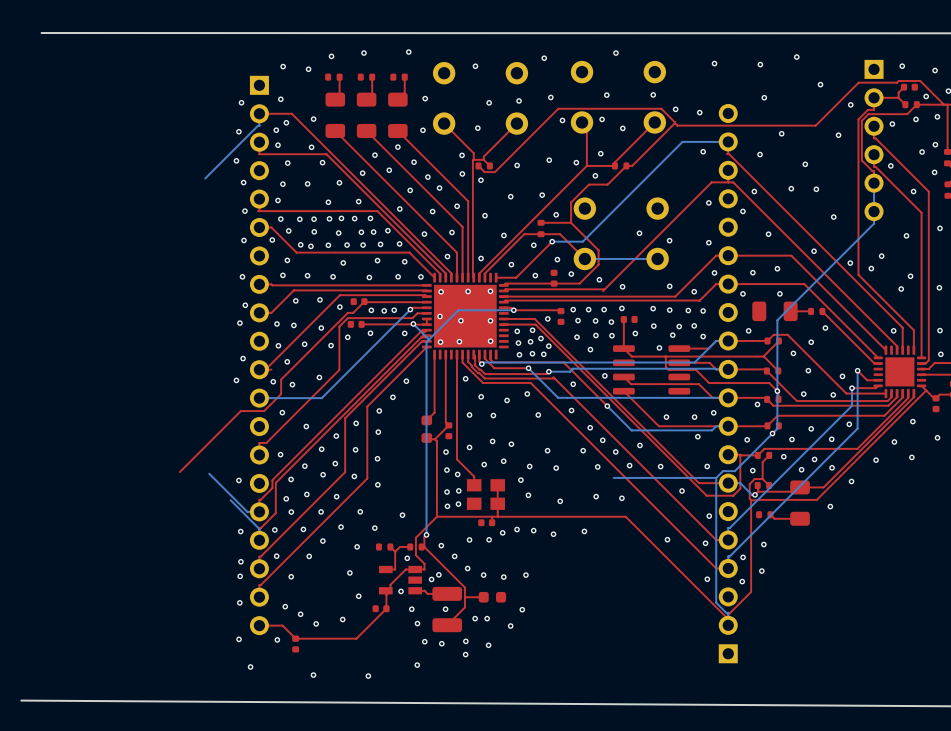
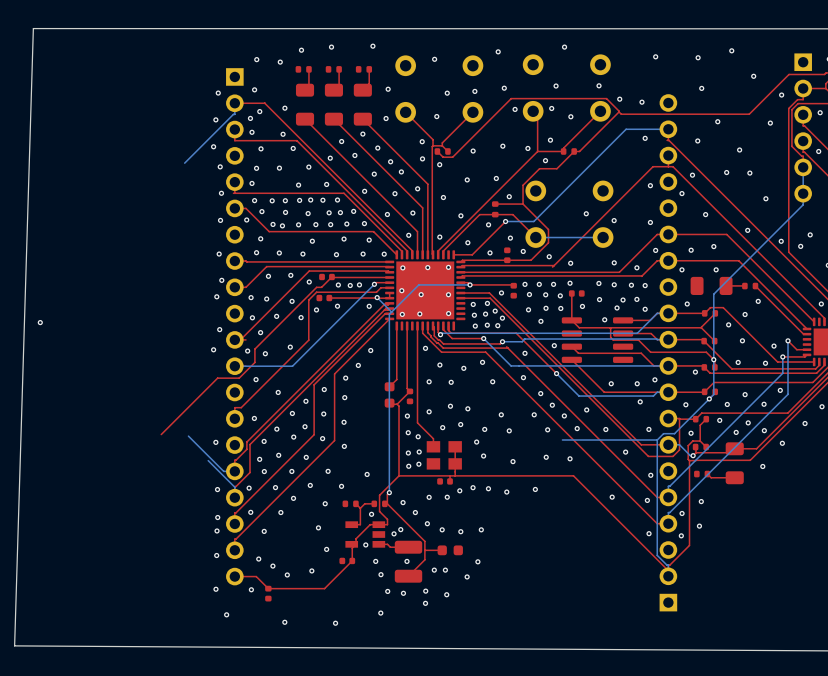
board edge: none -> (33, 28) (14, 645)
via: none -> (40, 322)

